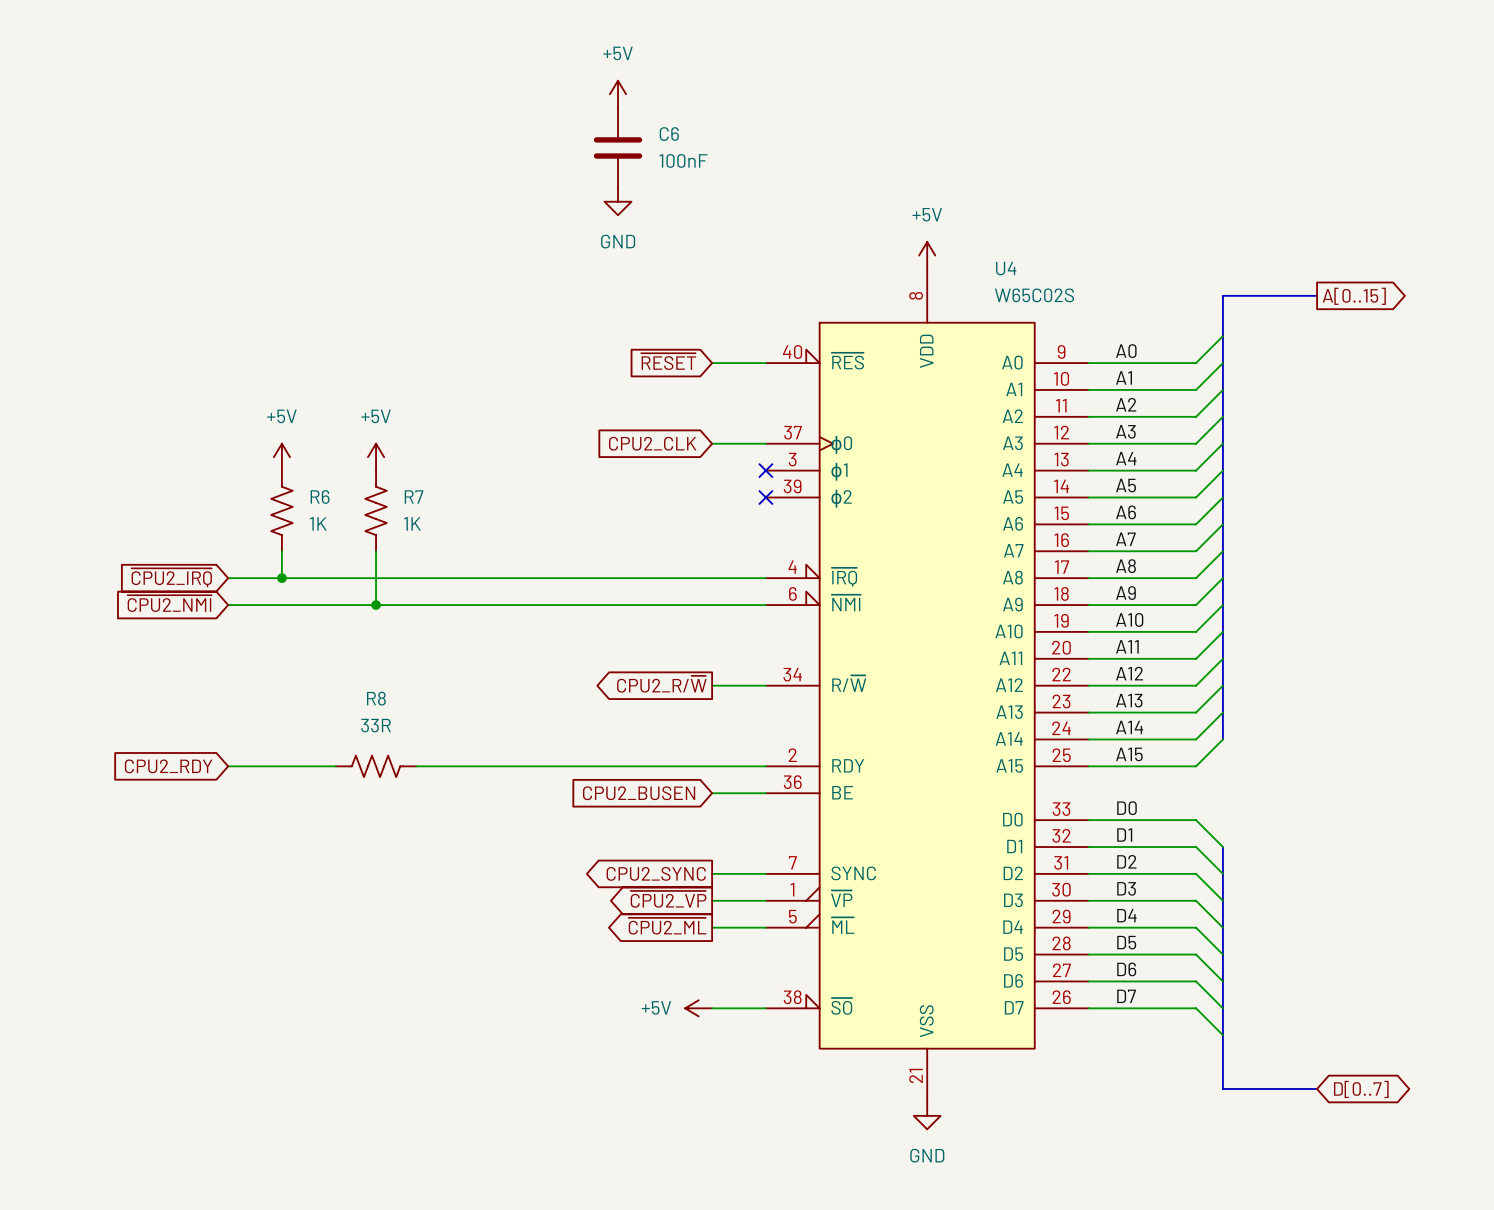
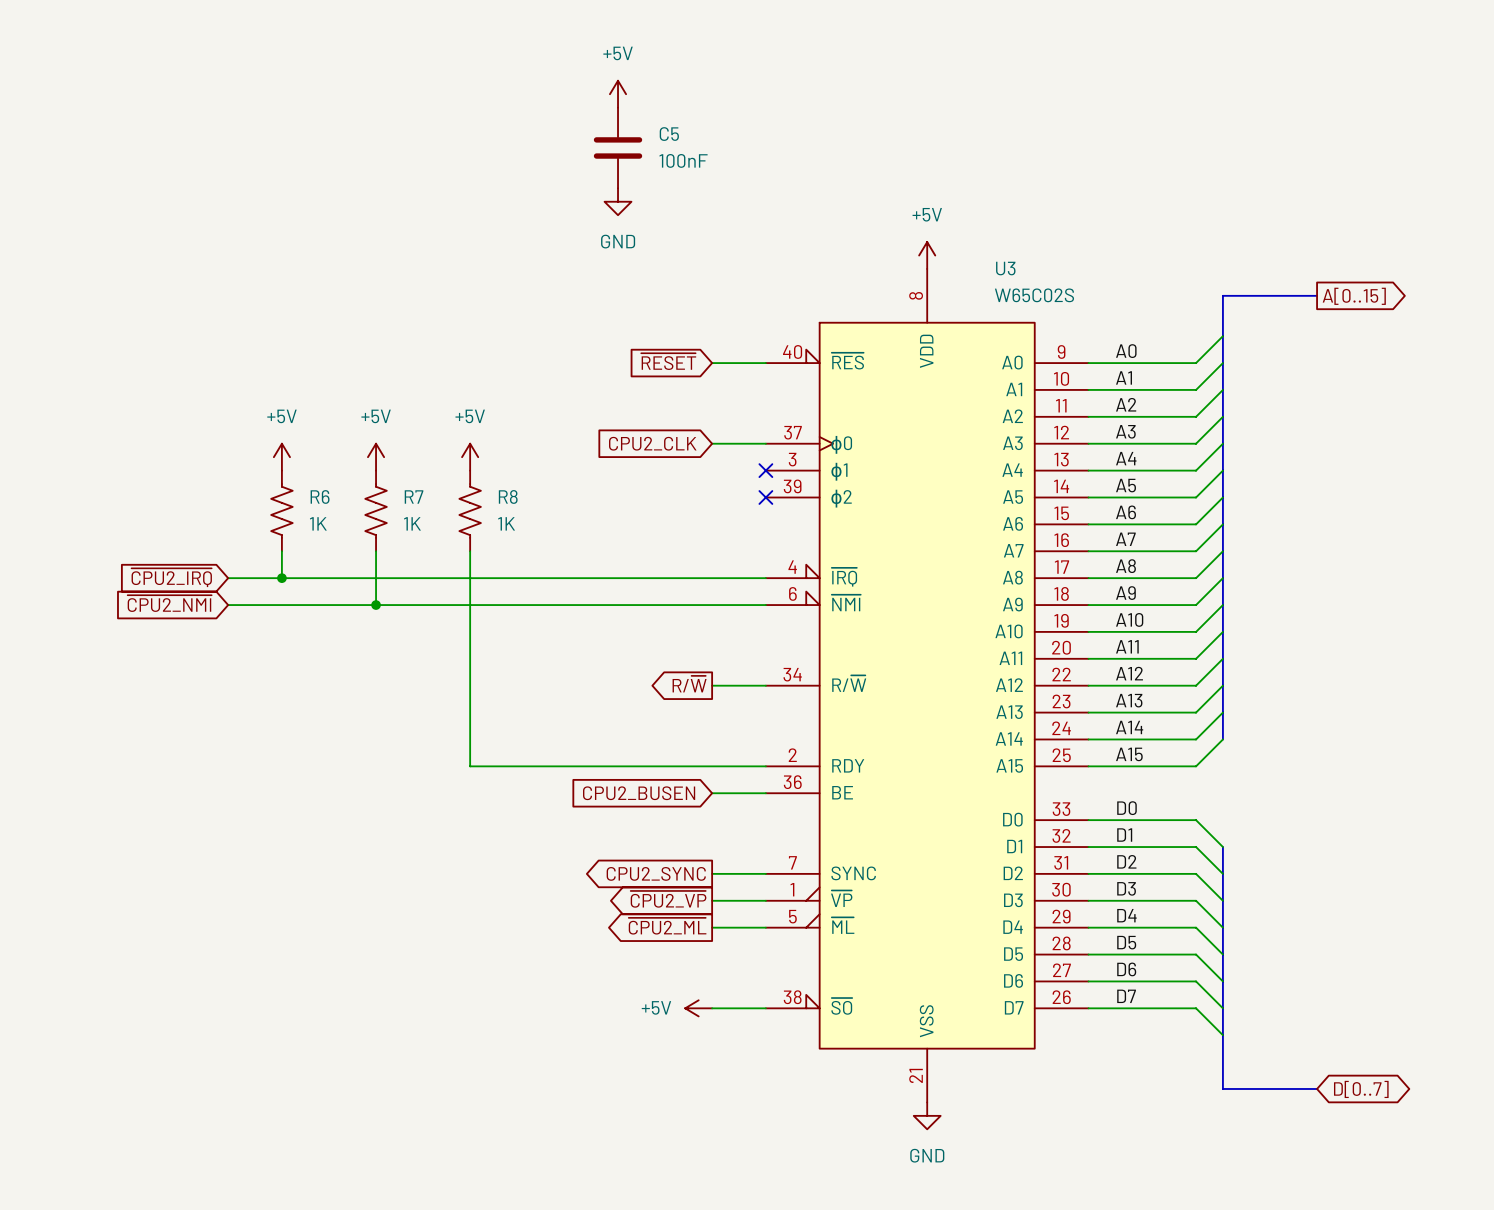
C6 name: C6 (669, 134) -> C5 (669, 134)
U4 name: U4 (1006, 268) -> U3 (1005, 268)
power symbol: none -> +5V (470, 457)
global label: CPU2_R/~{W} (661, 684) -> R/~{W} (689, 684)
R8 name position: R8 (376, 698) -> R8 (508, 496)
R8 value: 33R (376, 725) -> 1K (506, 523)
global label: CPU2_RDY (168, 766) -> none
wire: (228, 766) (335, 766) -> none
R8 rotation: 0° (376, 766) -> 90° clockwise (470, 510)
R8 position: (376, 766) -> (470, 510)
wire: (416, 766) (470, 766) -> (470, 551) (470, 766)

